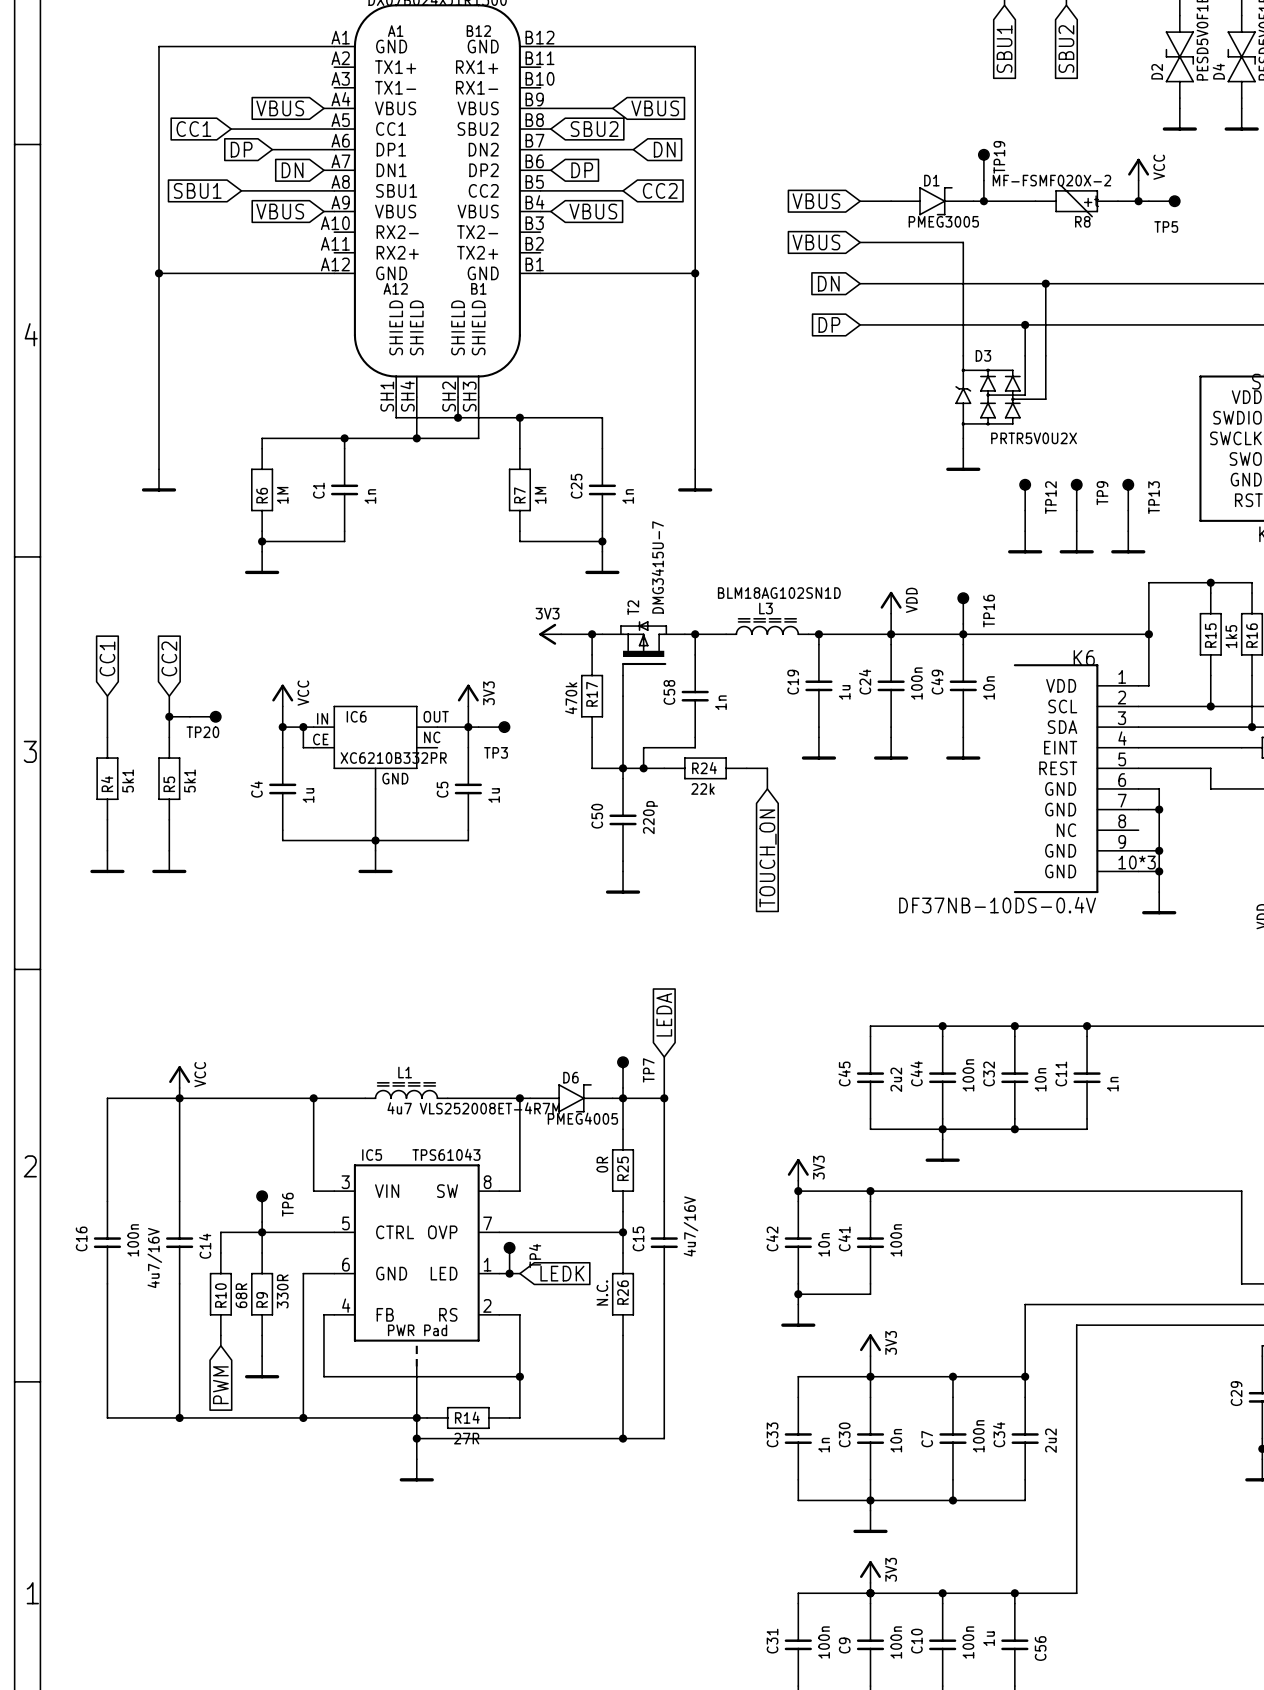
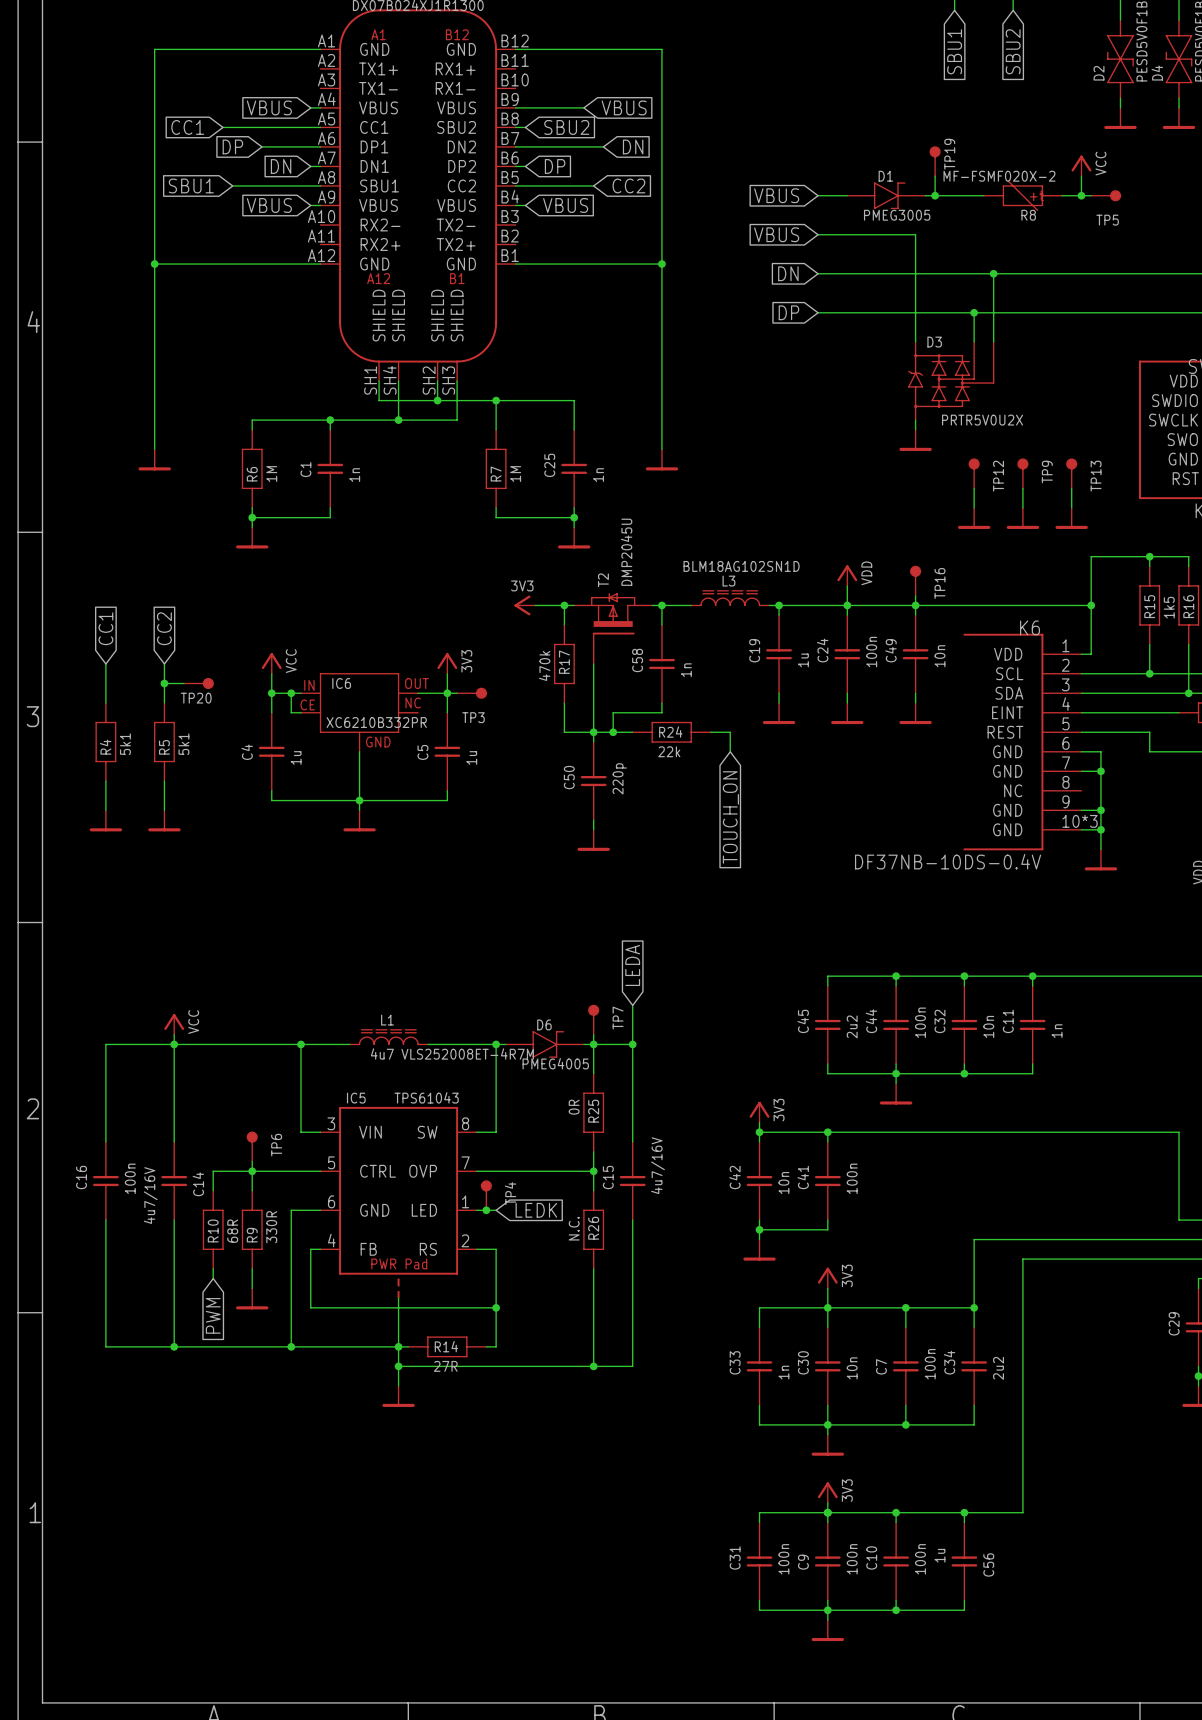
T2 value: DMG3415U-7 (657, 567) -> DMP2045U (626, 552)

